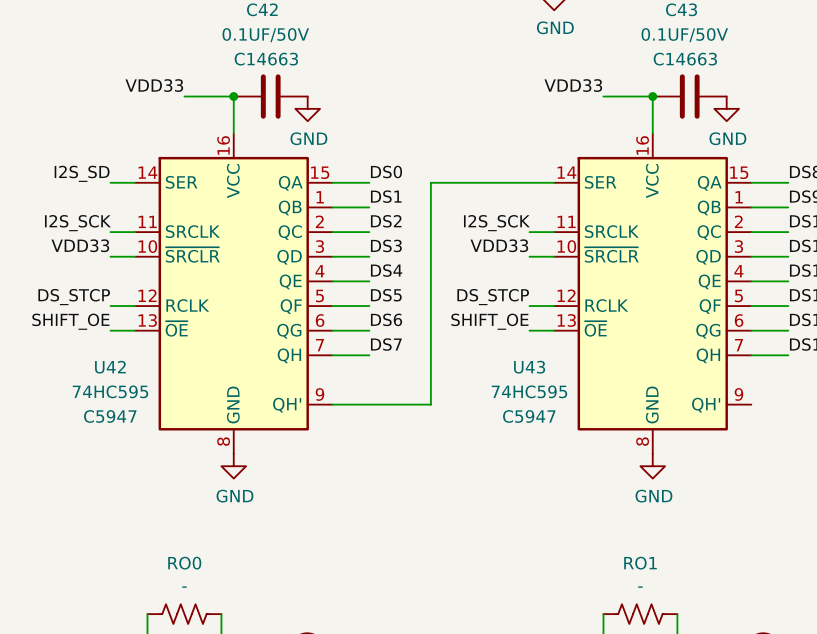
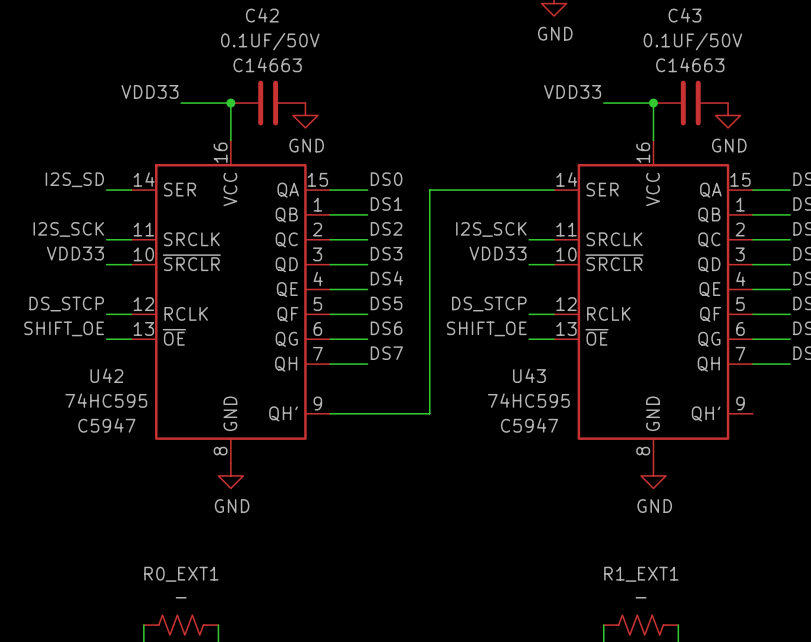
RO0 name: RO0 (184, 563) -> R0_EXT1 (181, 574)
RO1 name: RO1 (640, 563) -> R1_EXT1 (641, 574)

